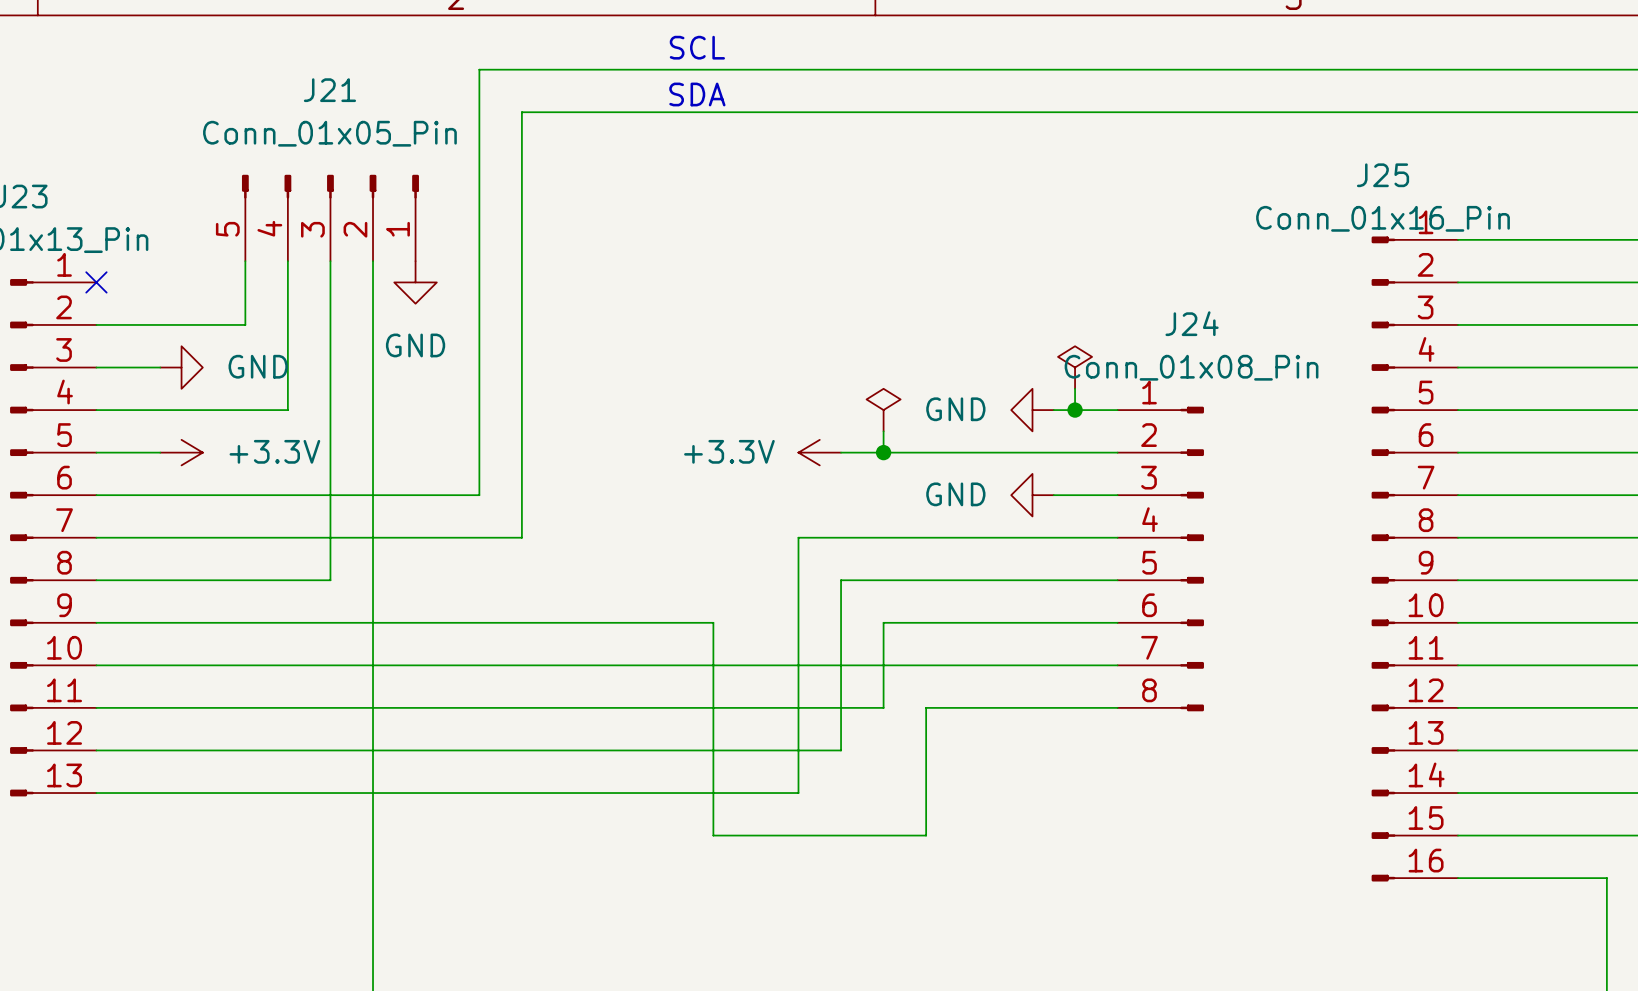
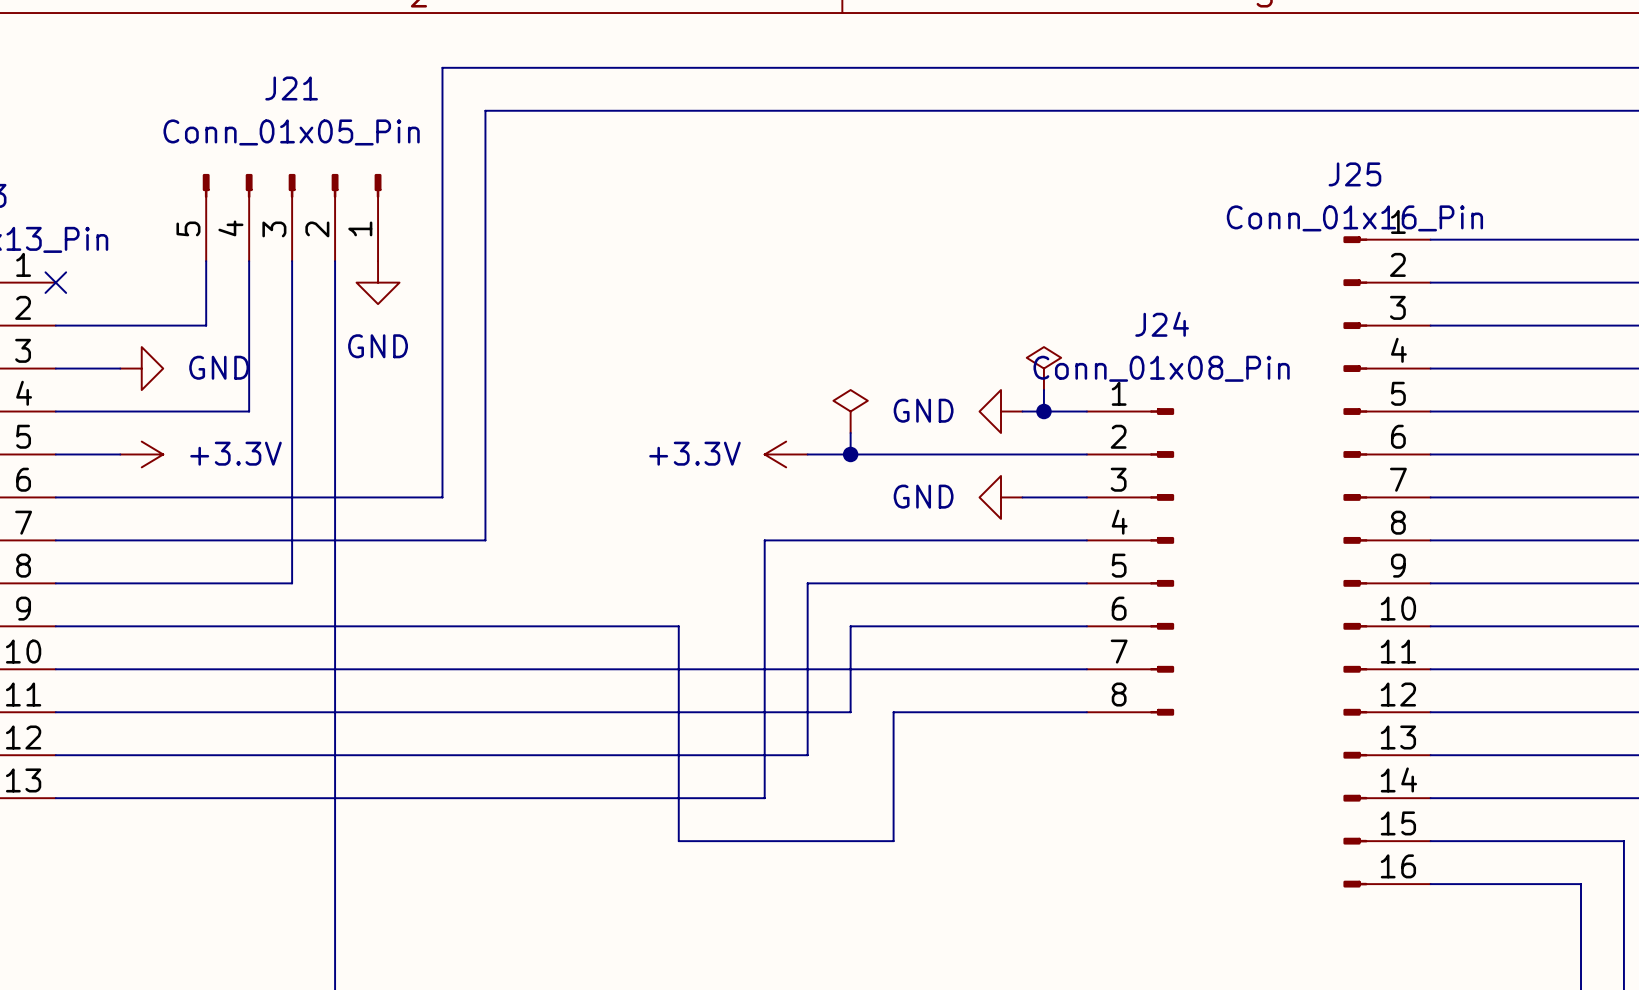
text: SCL (697, 47) -> none
text: SDA (697, 94) -> none

